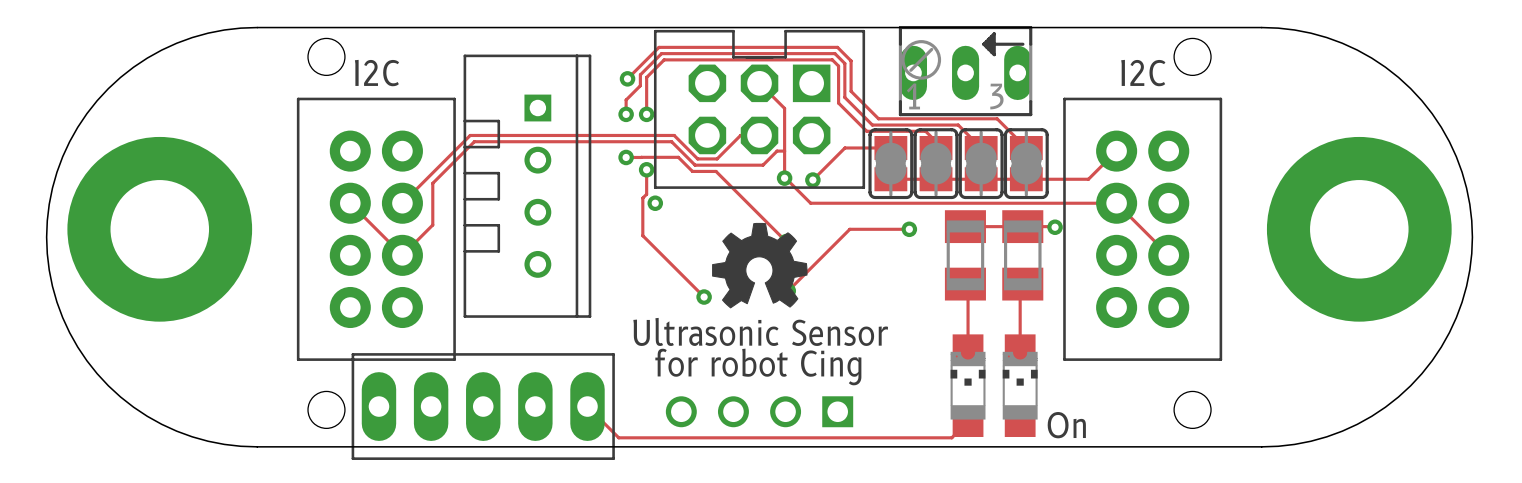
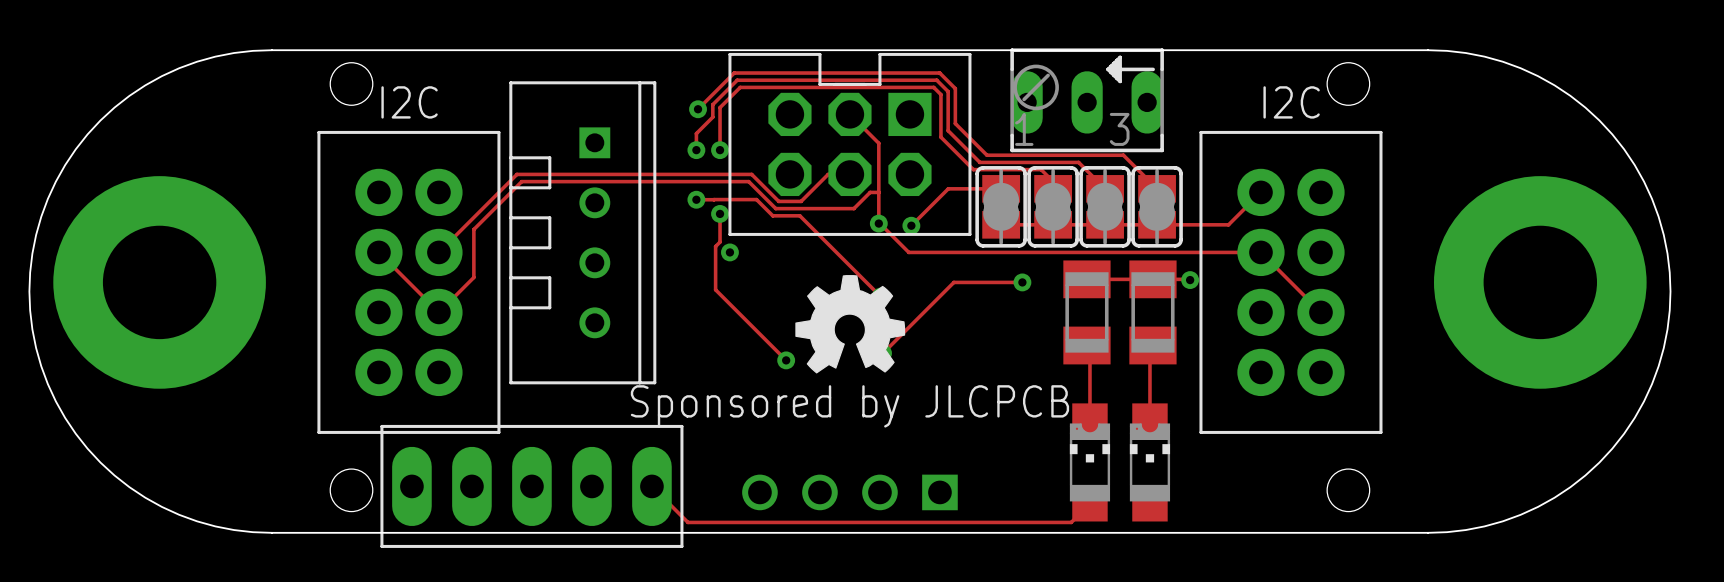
text: Ultrasonic Sensor (760, 331) -> Sponsored by JLCPCB (849, 406)
text: for robot Cing (758, 366) -> none
text: On (1066, 425) -> none

